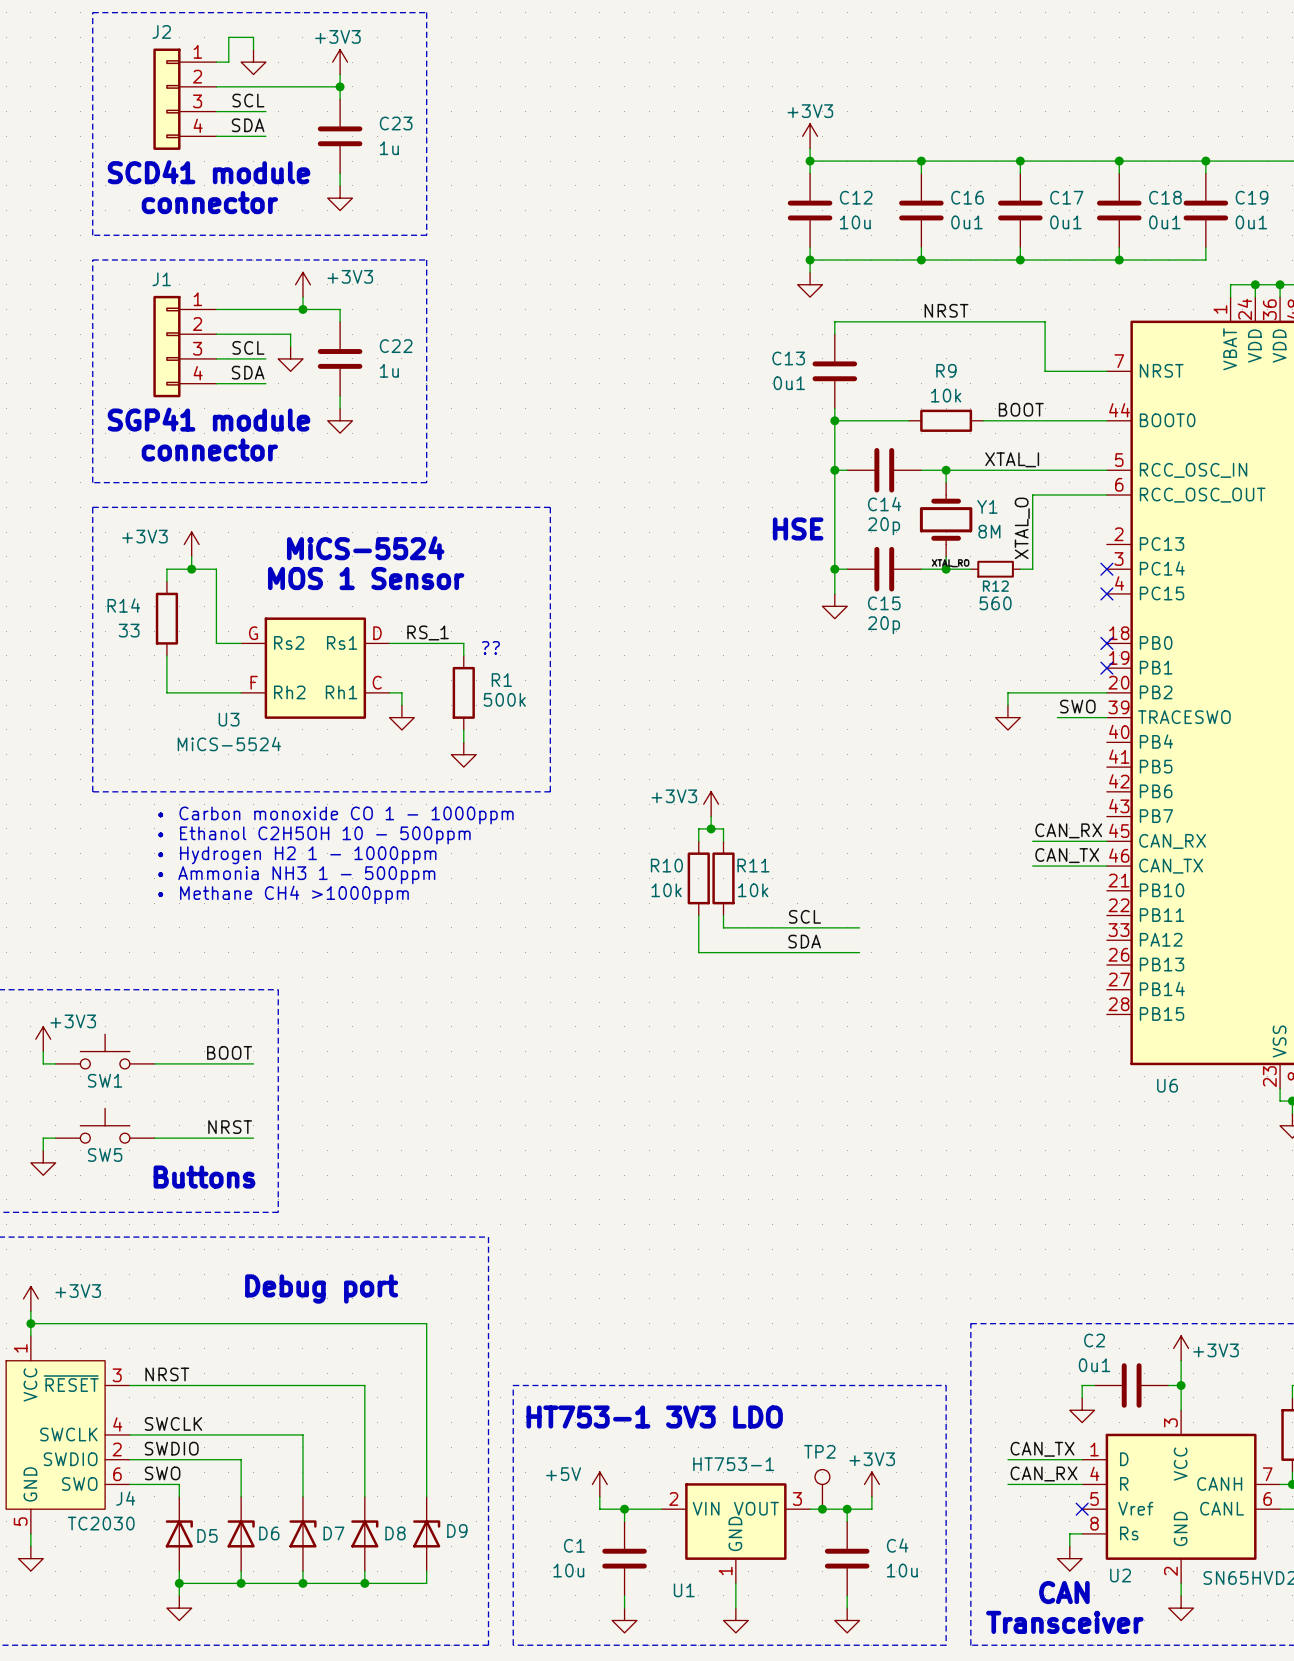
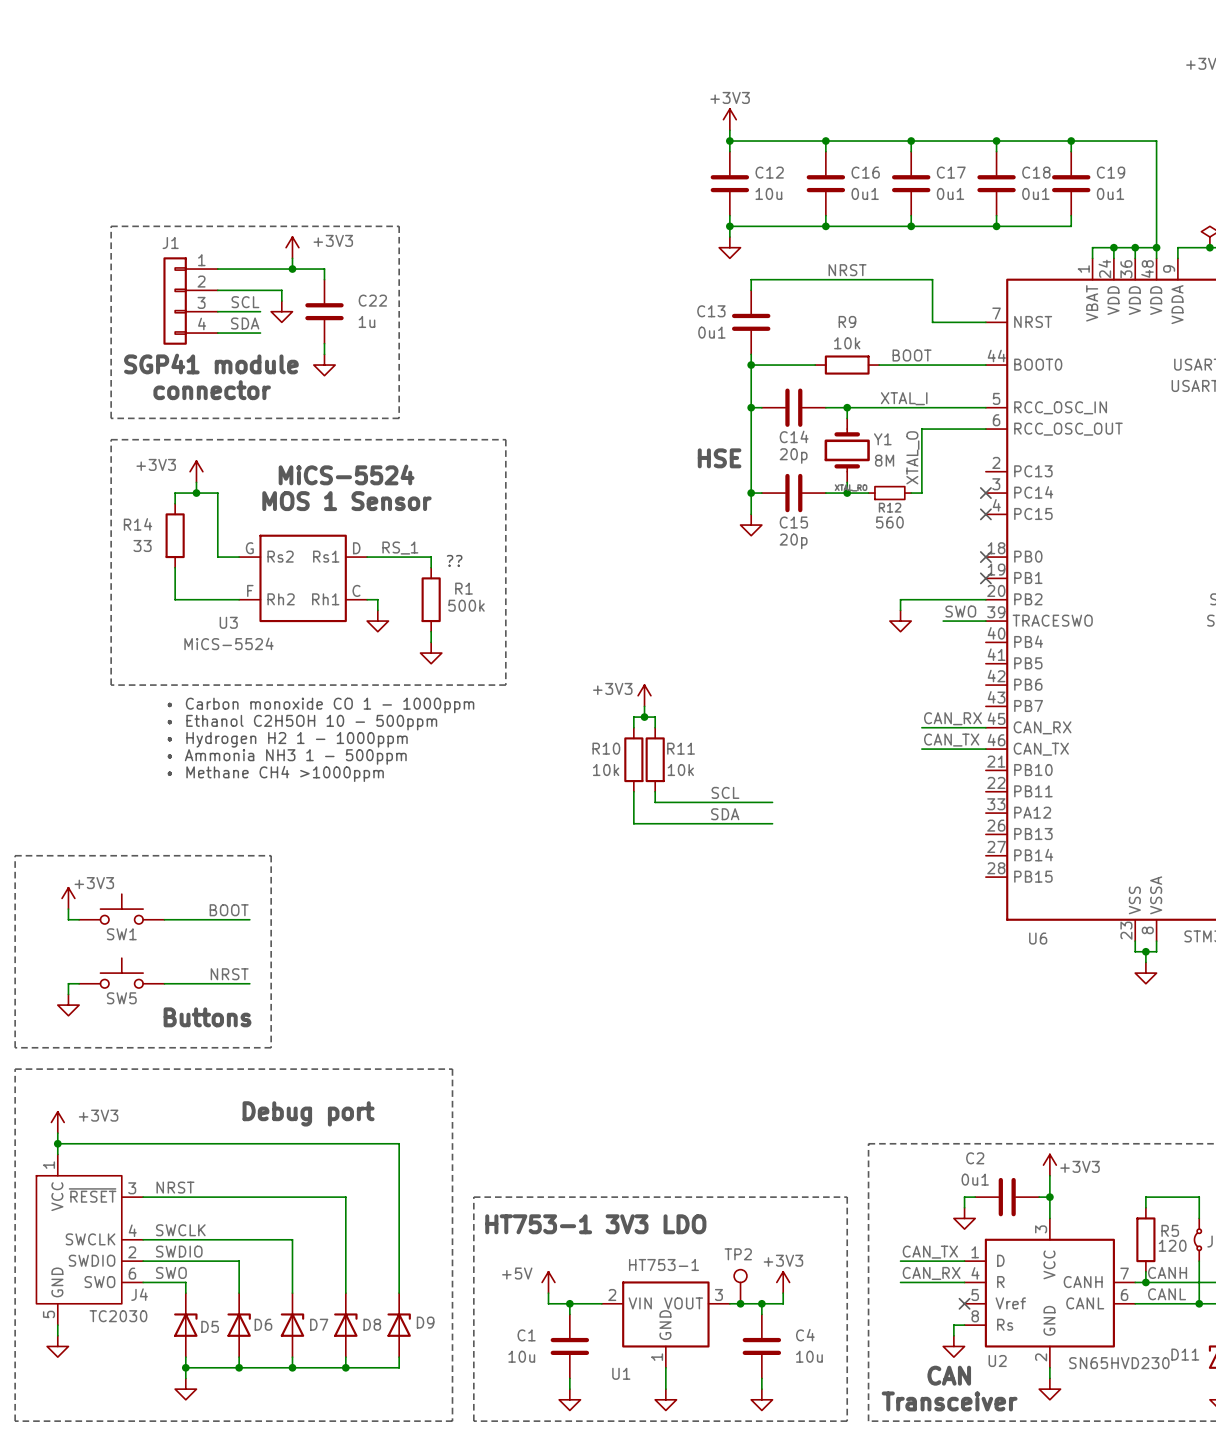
line: (92, 12) (426, 12) (426, 235) (92, 235) (92, 12) -> none
wire: (253, 49) (253, 37) (228, 37) (228, 62) (216, 62) -> none
power symbol: (253, 62) -> none
power symbol: +3V3 (340, 62) -> none
wire: (340, 74) (340, 99) -> none
wire: (216, 86) (340, 86) -> none
junction: (340, 86) -> none
J2: (184, 99) -> none
label: SCL (248, 100) -> none
wire: (216, 111) (265, 111) -> none
label: SDA (248, 125) -> none
wire: (216, 136) (265, 136) -> none
C23: 1u (340, 136) -> none
text: SCD41 module (208, 172) -> none
wire: (340, 173) (340, 185) -> none
power symbol: (340, 198) -> none
text: connector (209, 202) -> none

